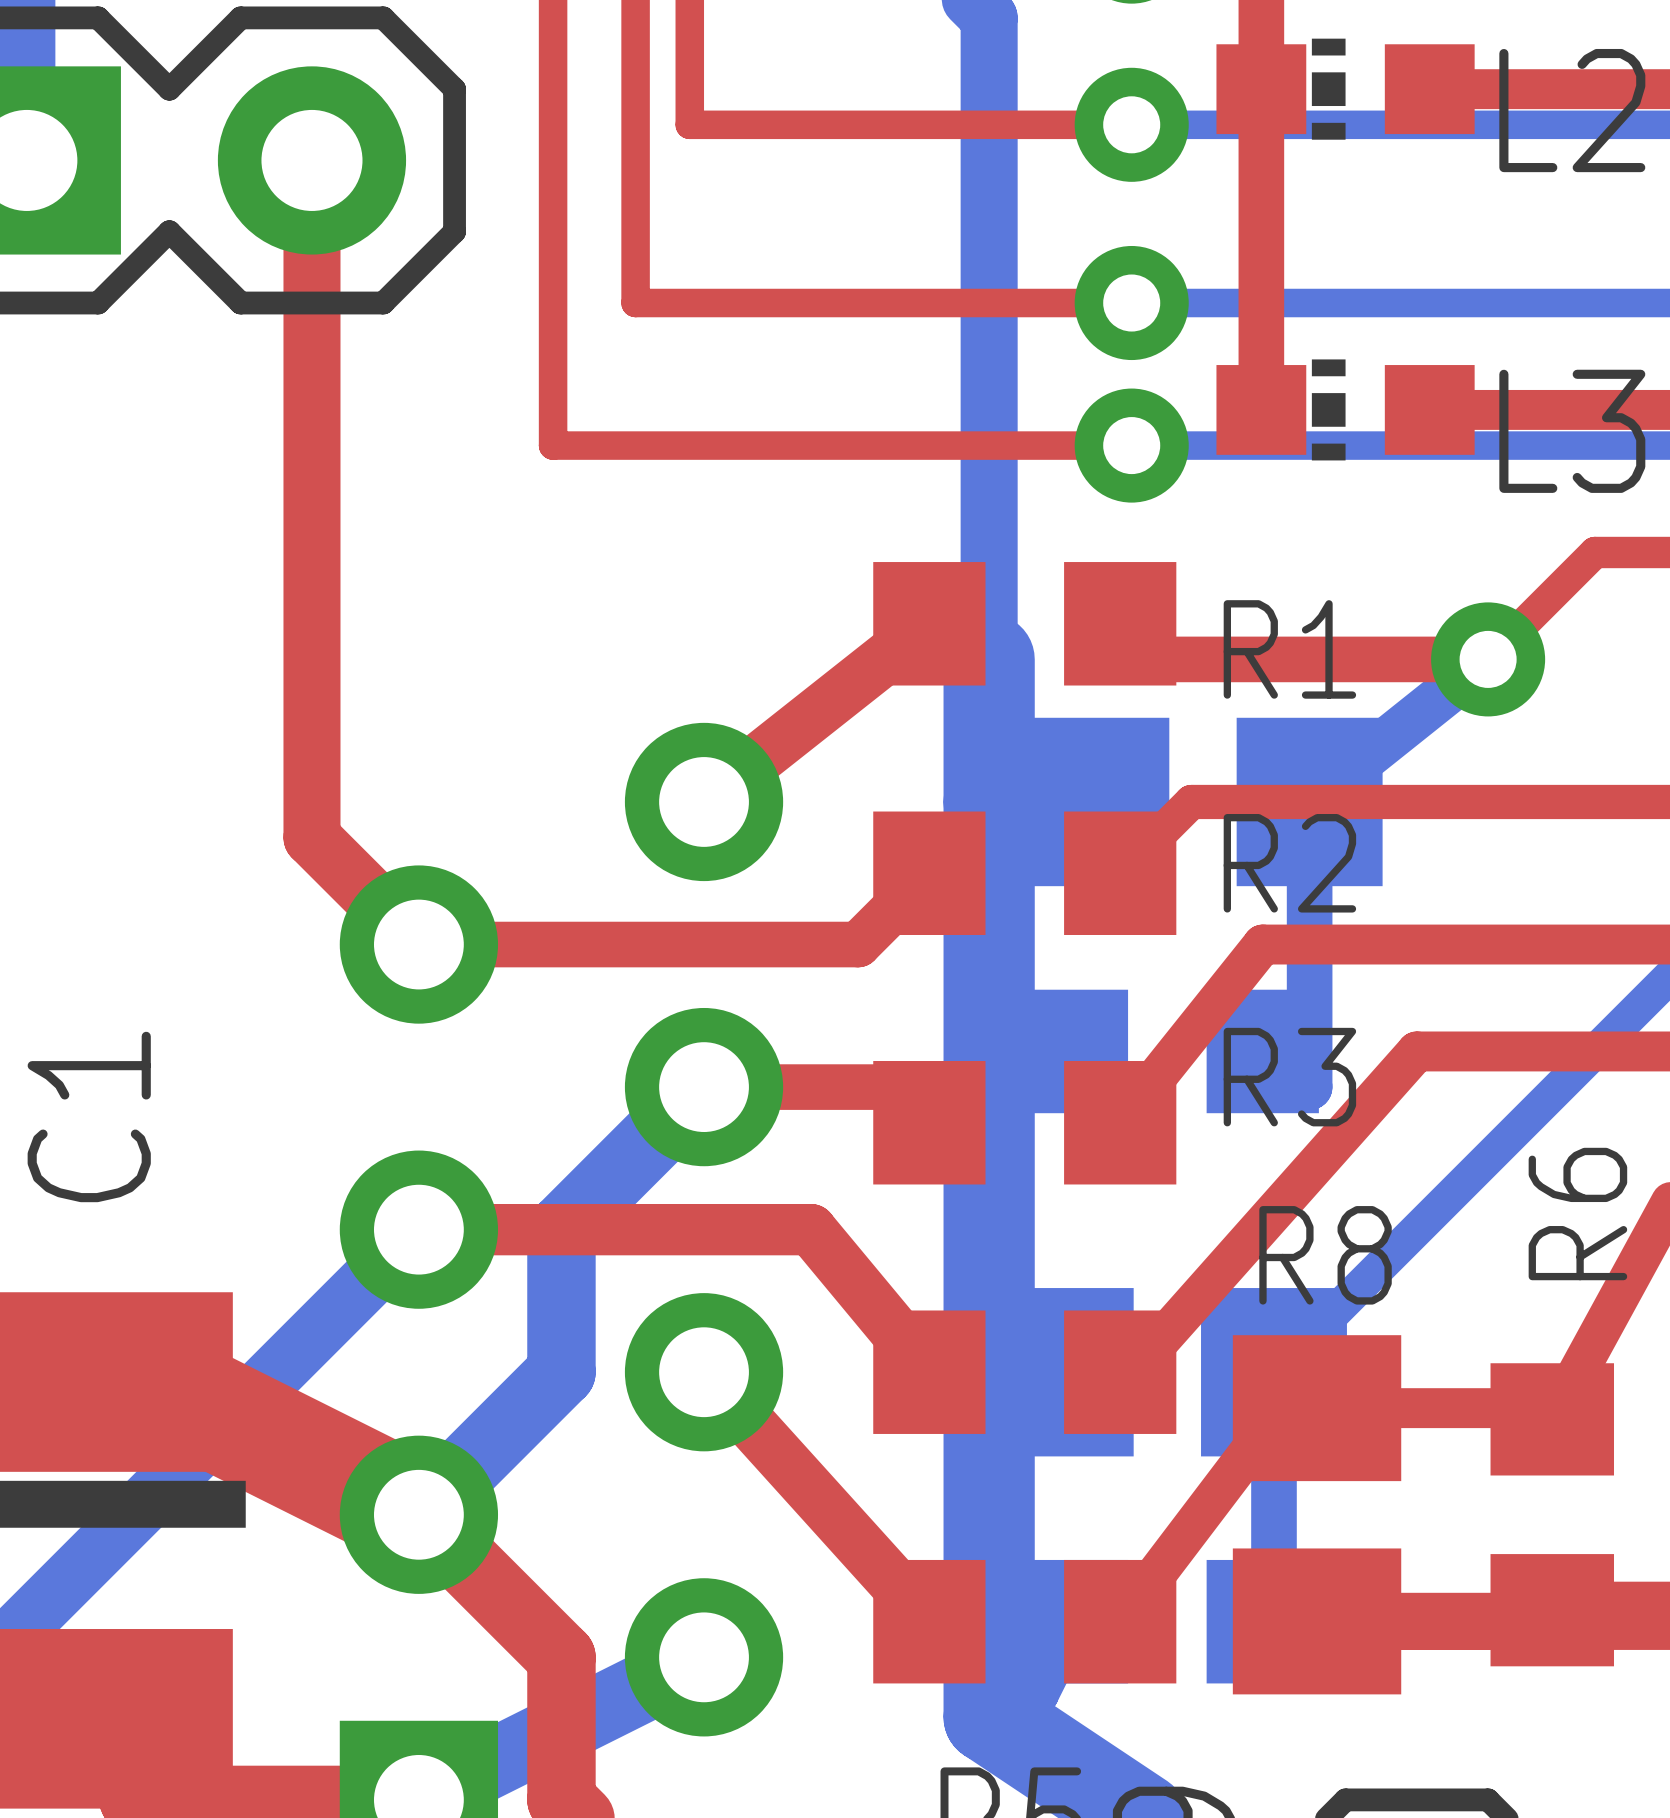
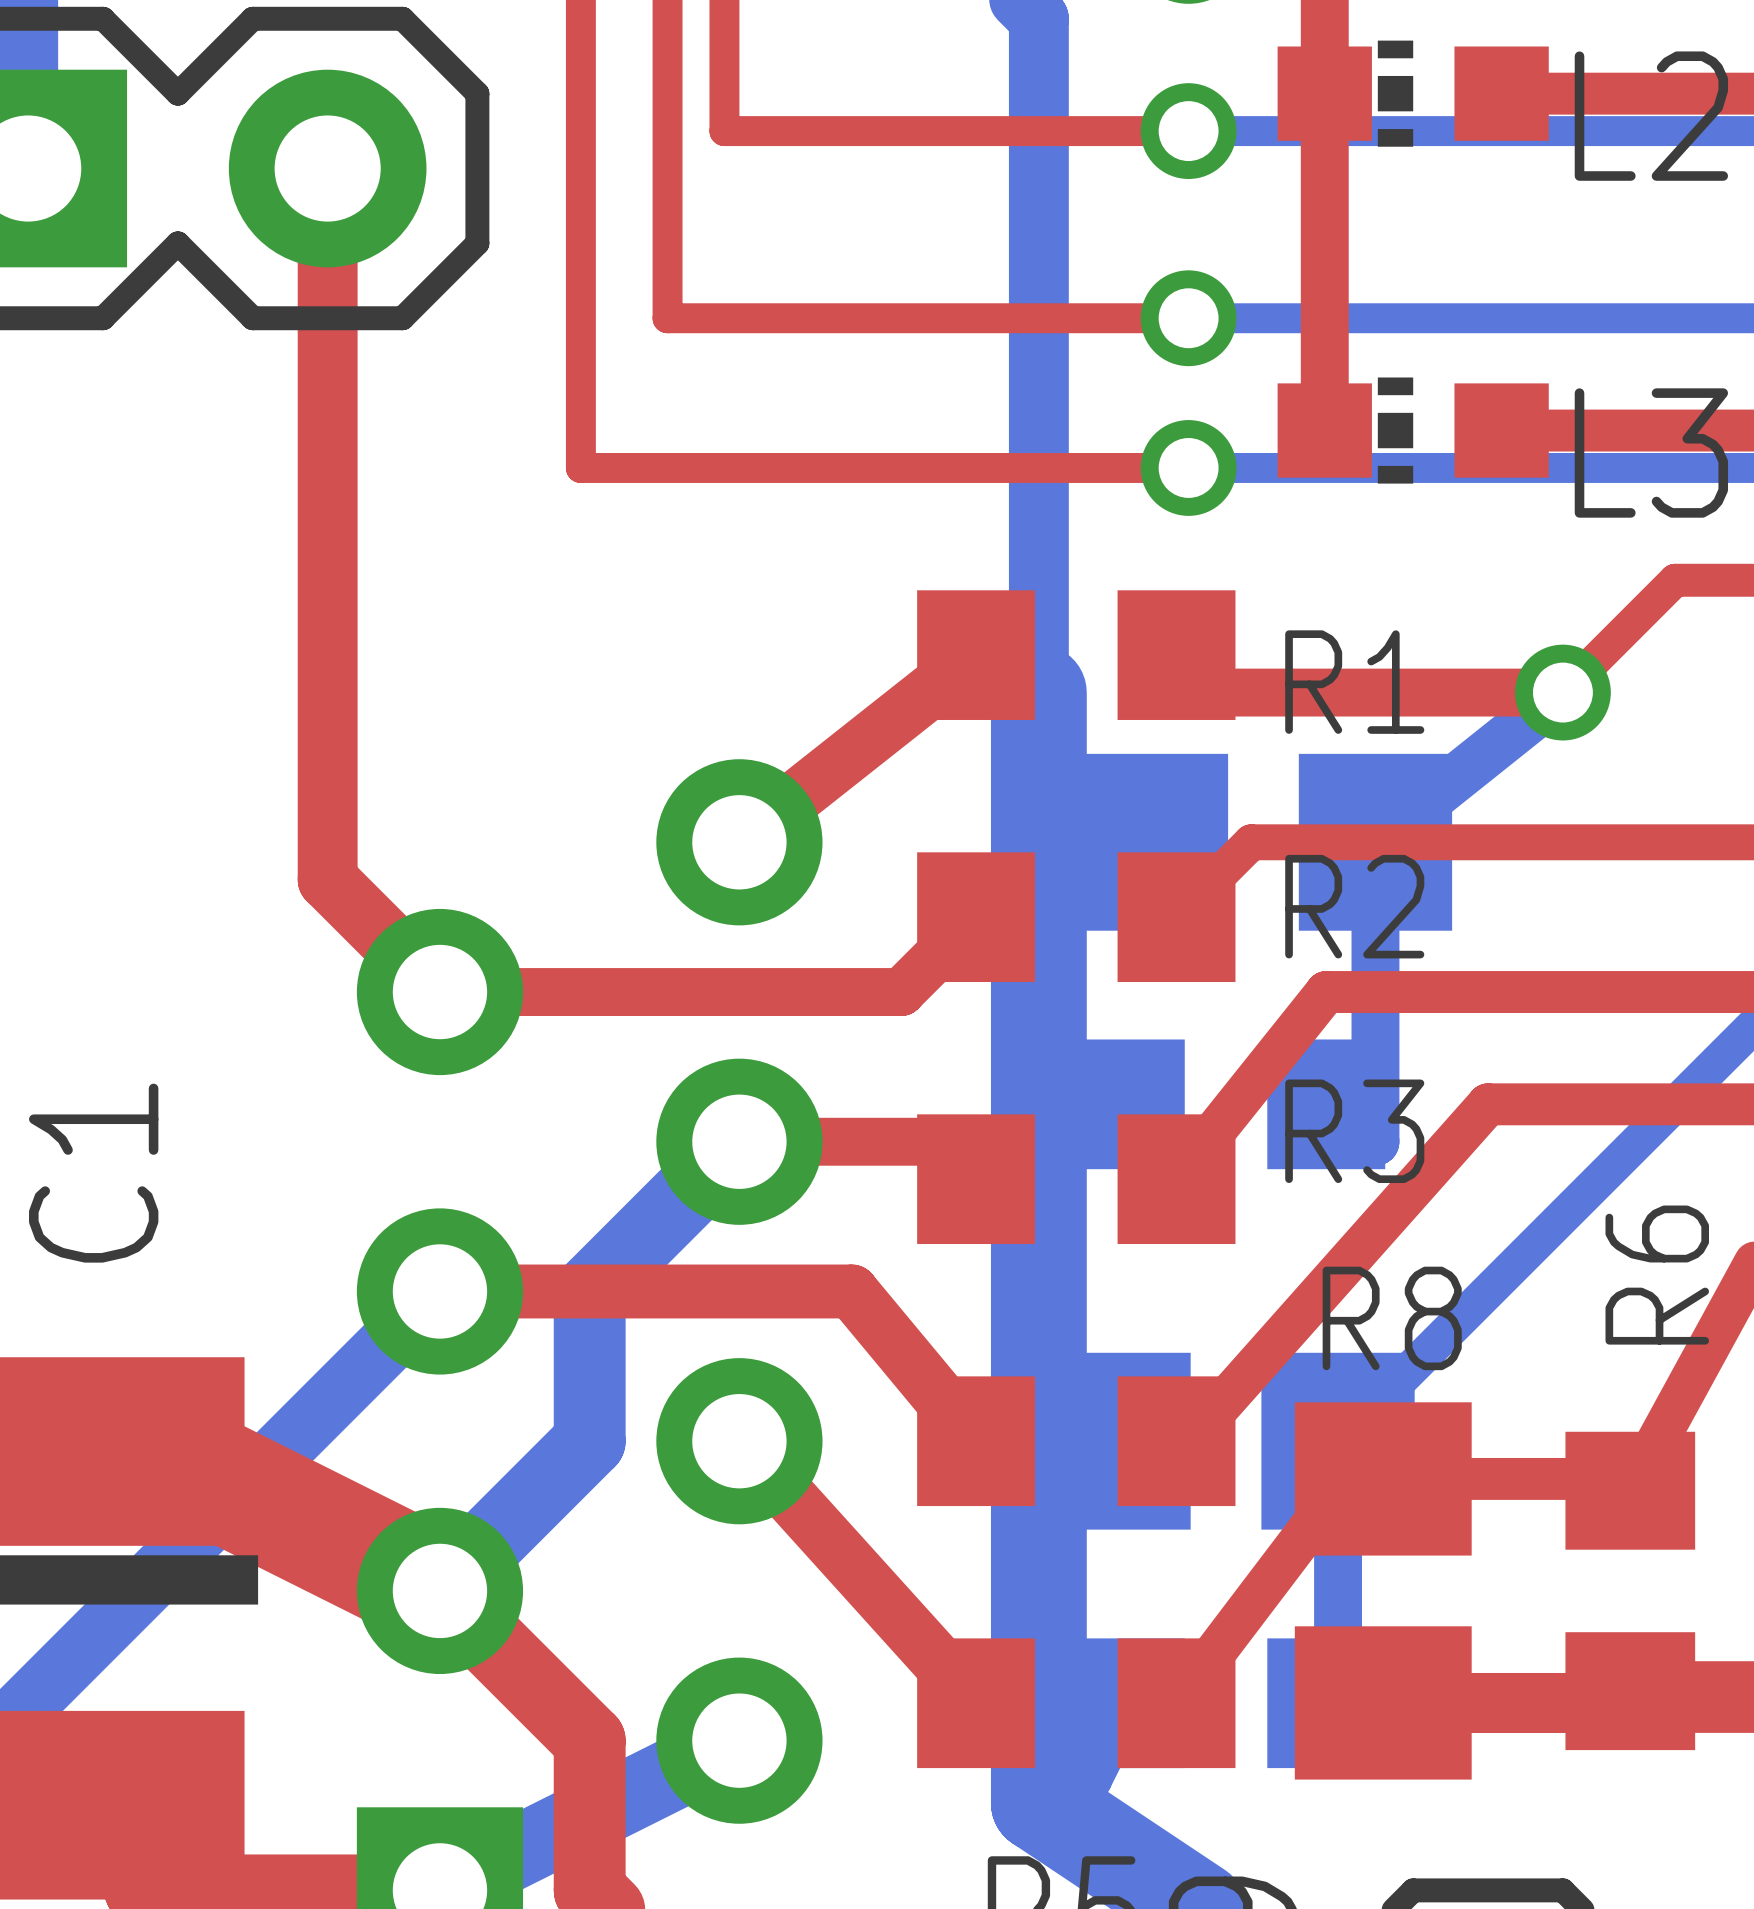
via size: [1074, 67, 1189, 182] -> [1140, 83, 1237, 180]
via size: [1074, 245, 1189, 361] -> [1140, 270, 1237, 367]
via size: [1074, 388, 1189, 503] -> [1140, 420, 1237, 516]
via size: [1431, 602, 1546, 717] -> [1515, 644, 1611, 741]

